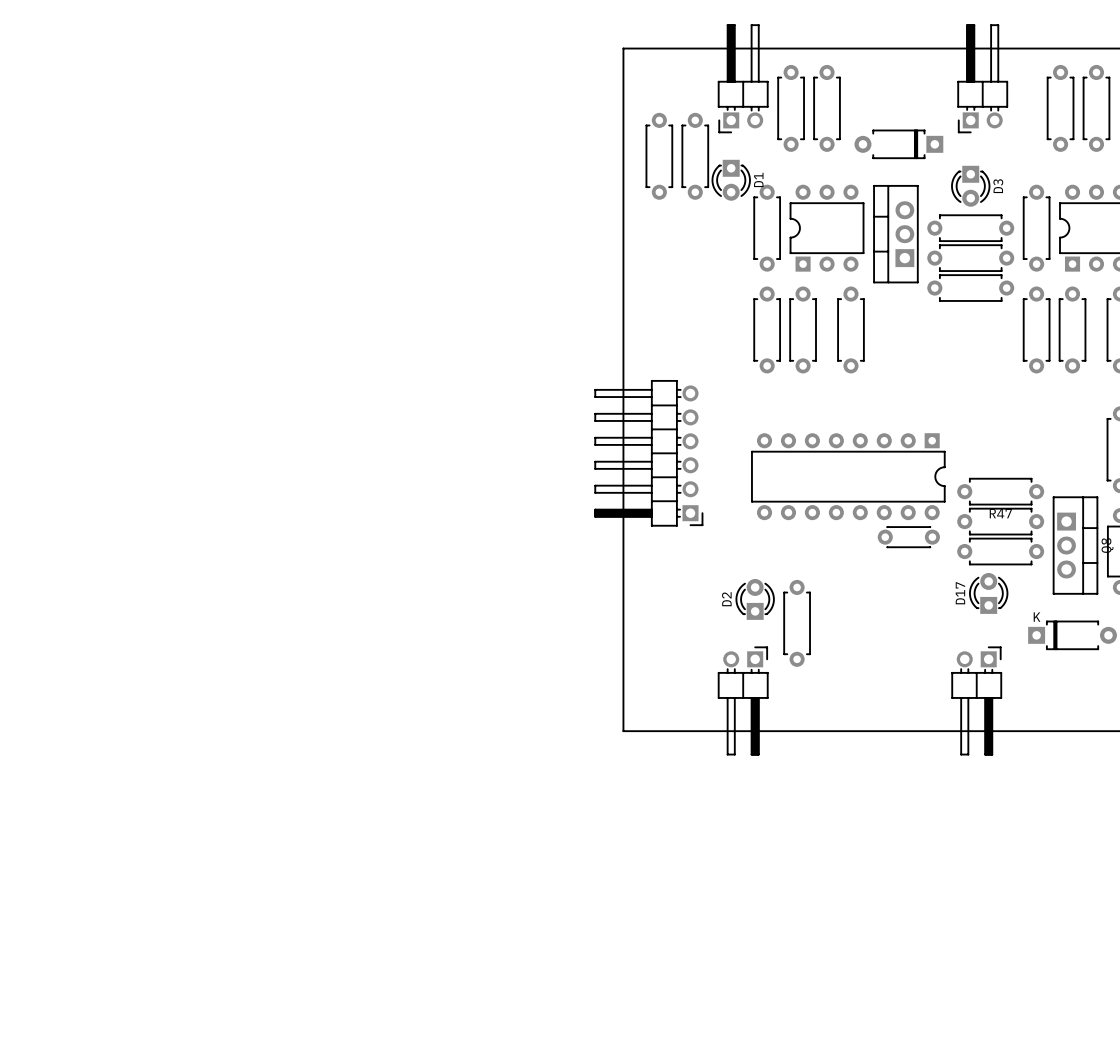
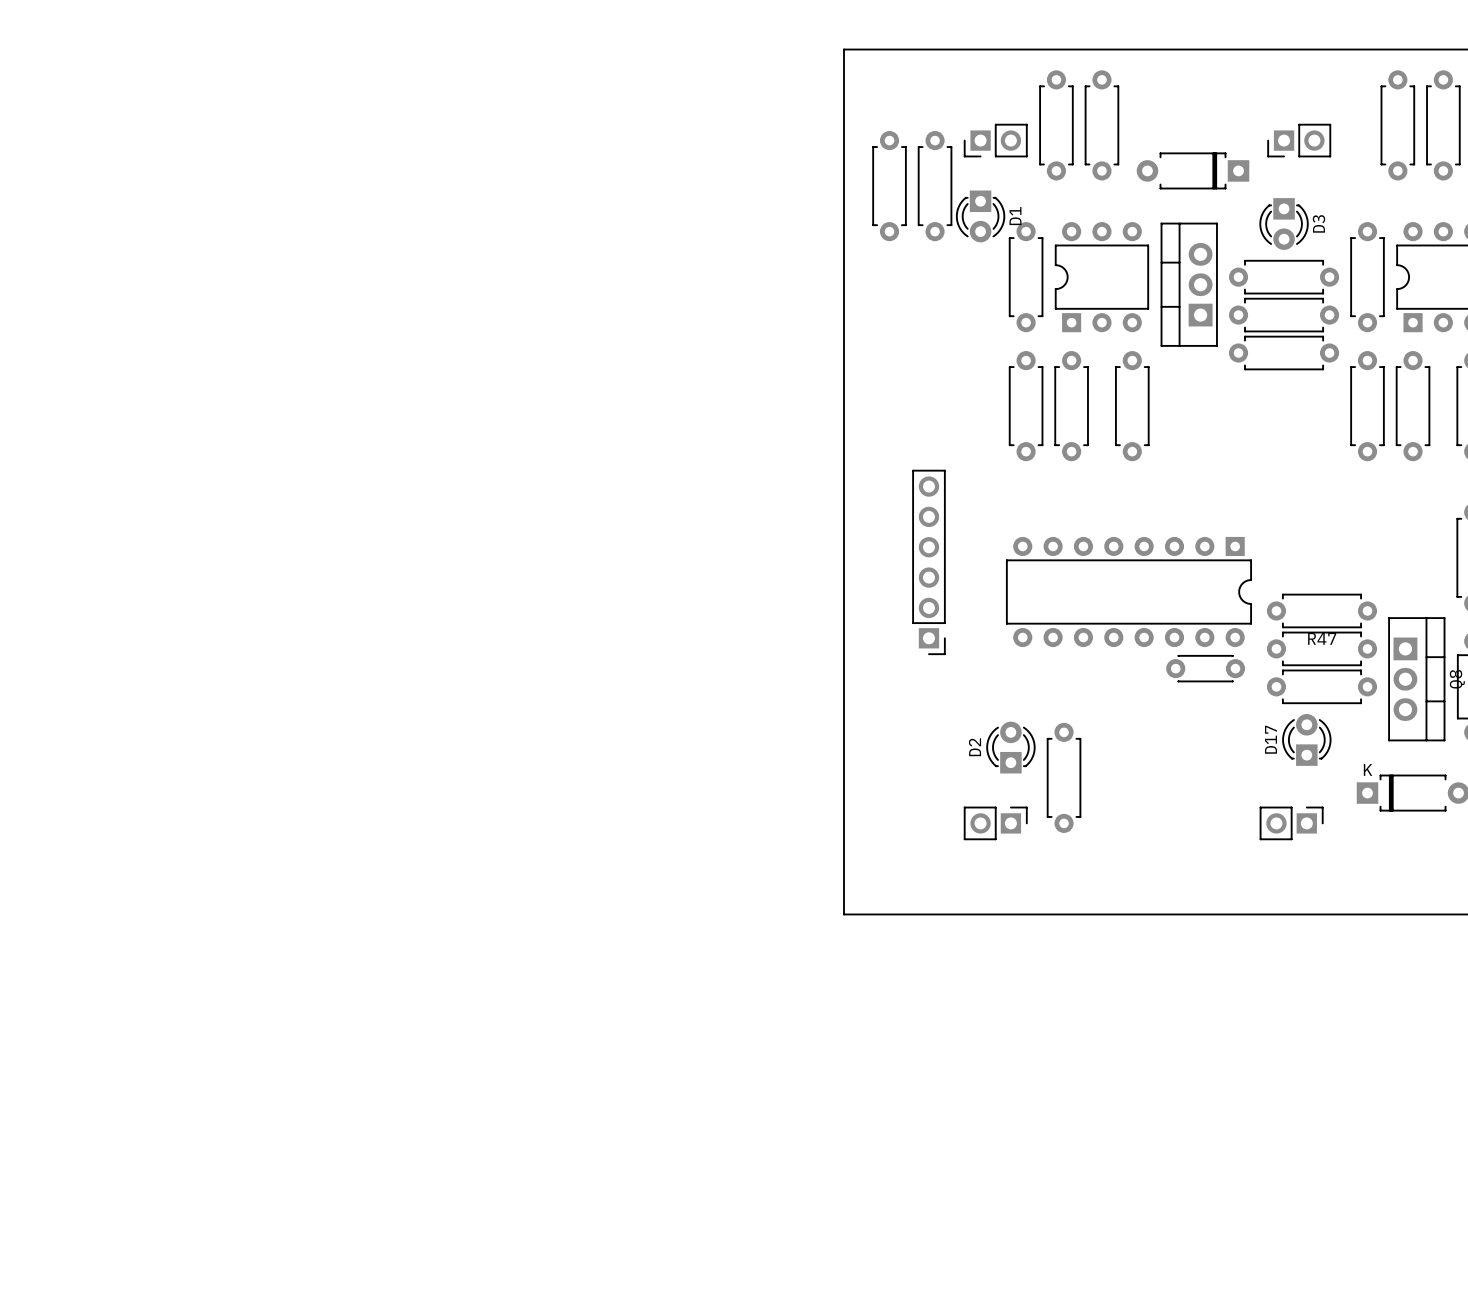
part: (743, 78) -> none
part: (982, 78) -> none
part: none -> (995, 140)
part: none -> (1299, 140)
part: (648, 453) -> none
part: none -> (928, 562)
part: none -> (995, 823)
part: none -> (1291, 823)
part: (743, 700) -> none
part: (976, 700) -> none

